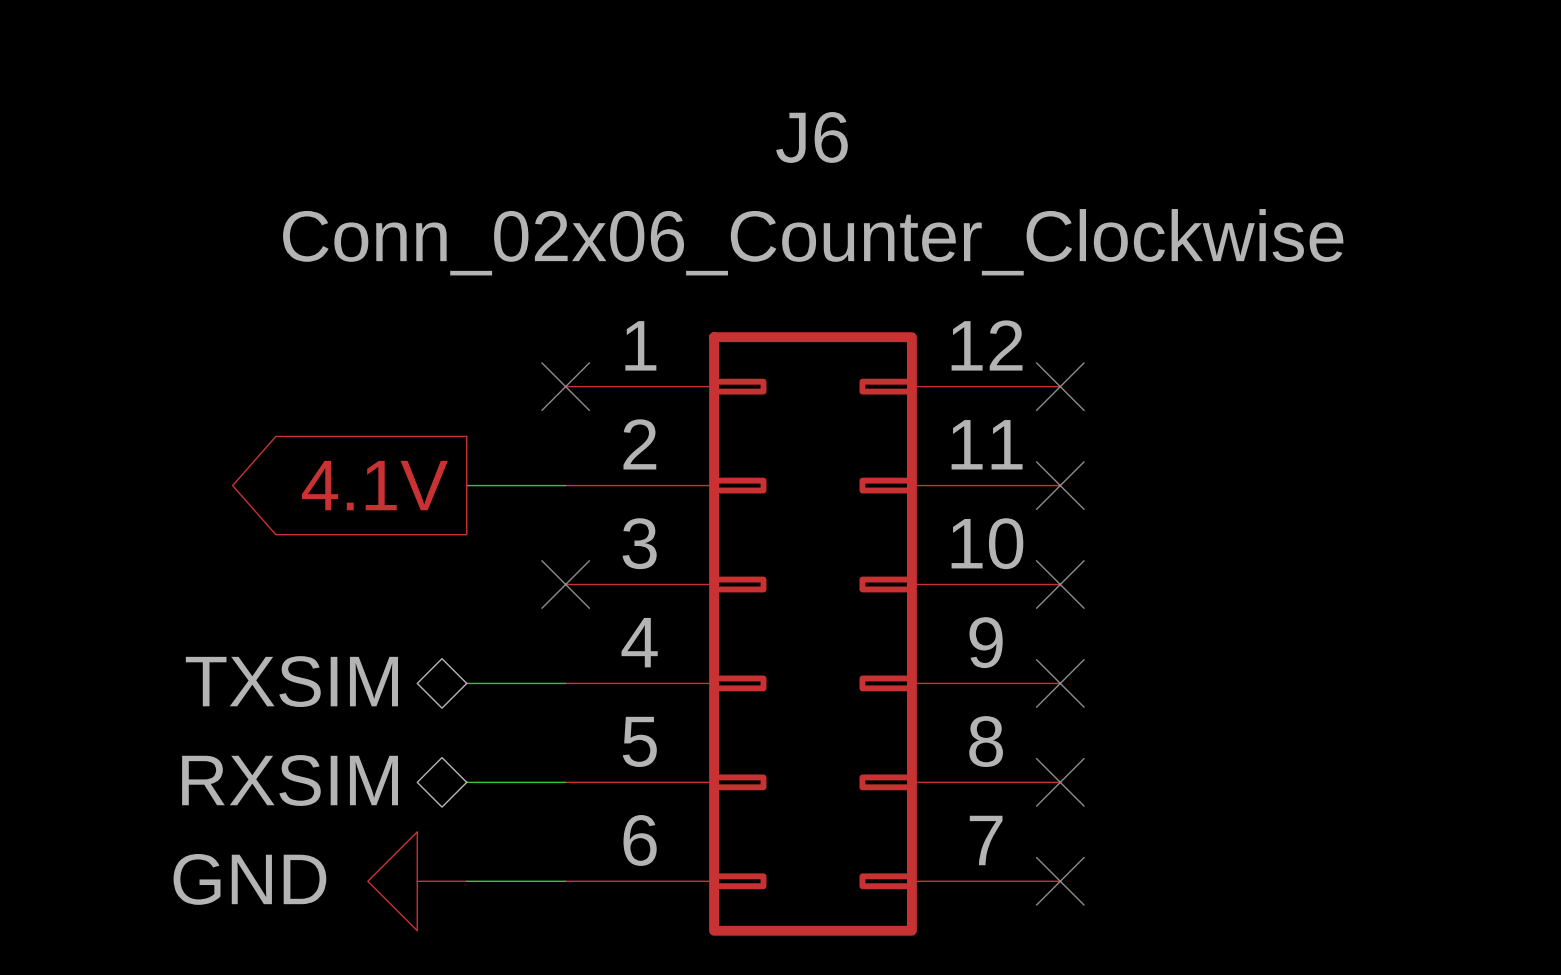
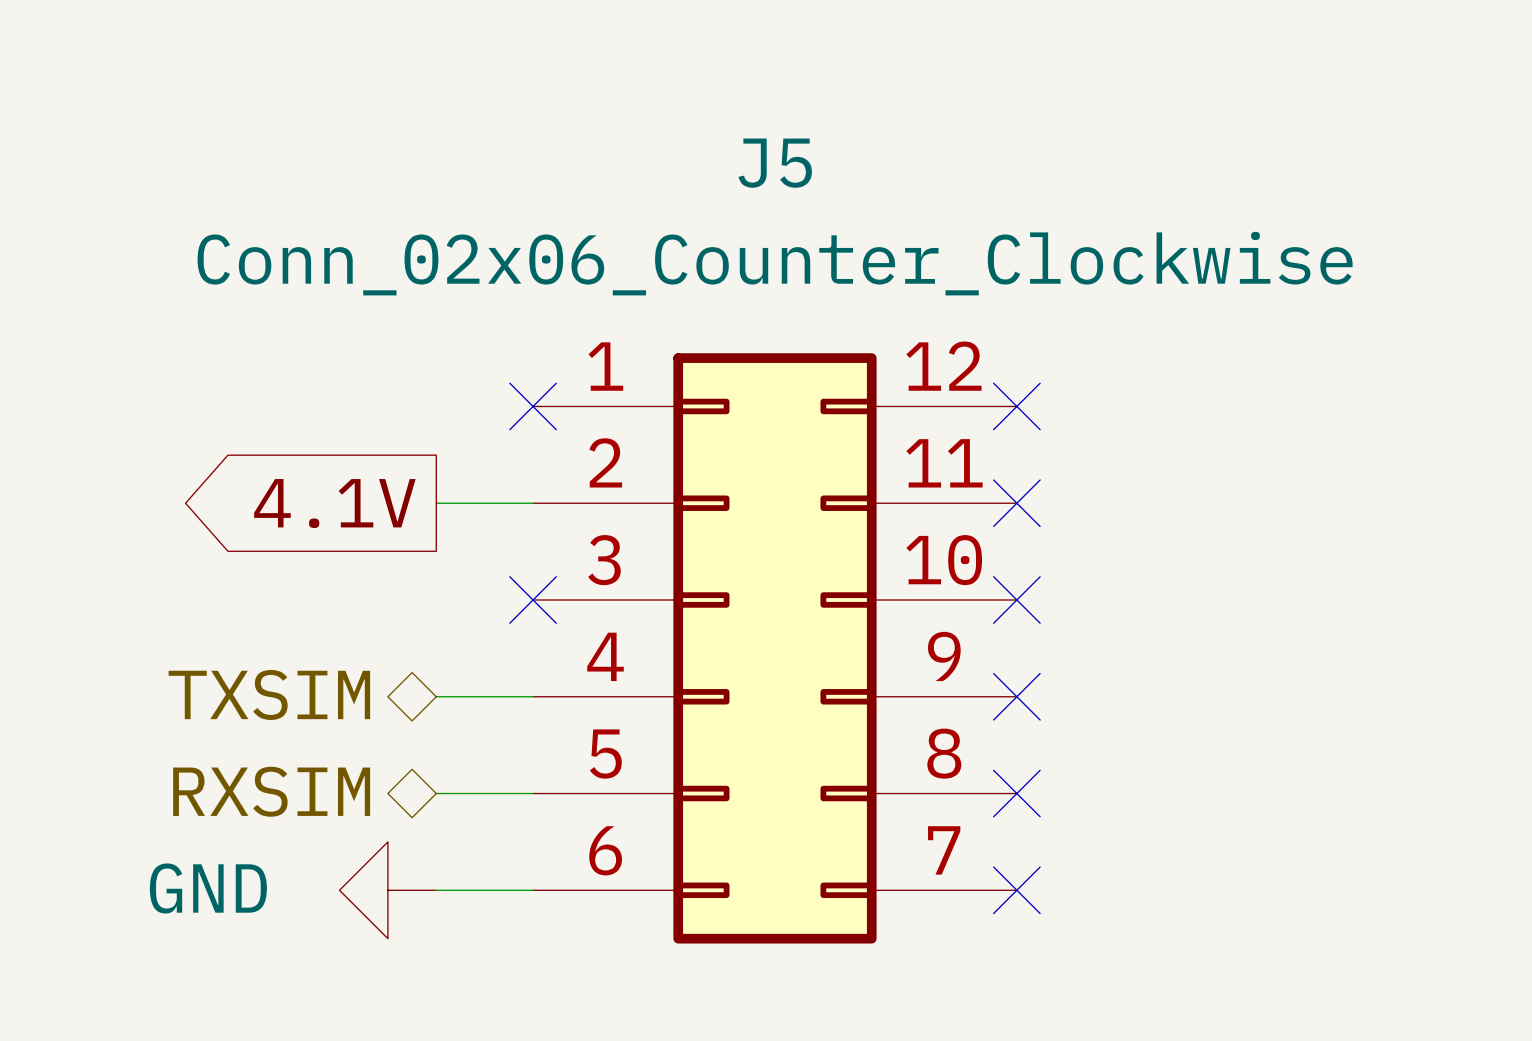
J6 name: J6 (811, 137) -> J5 (775, 163)

